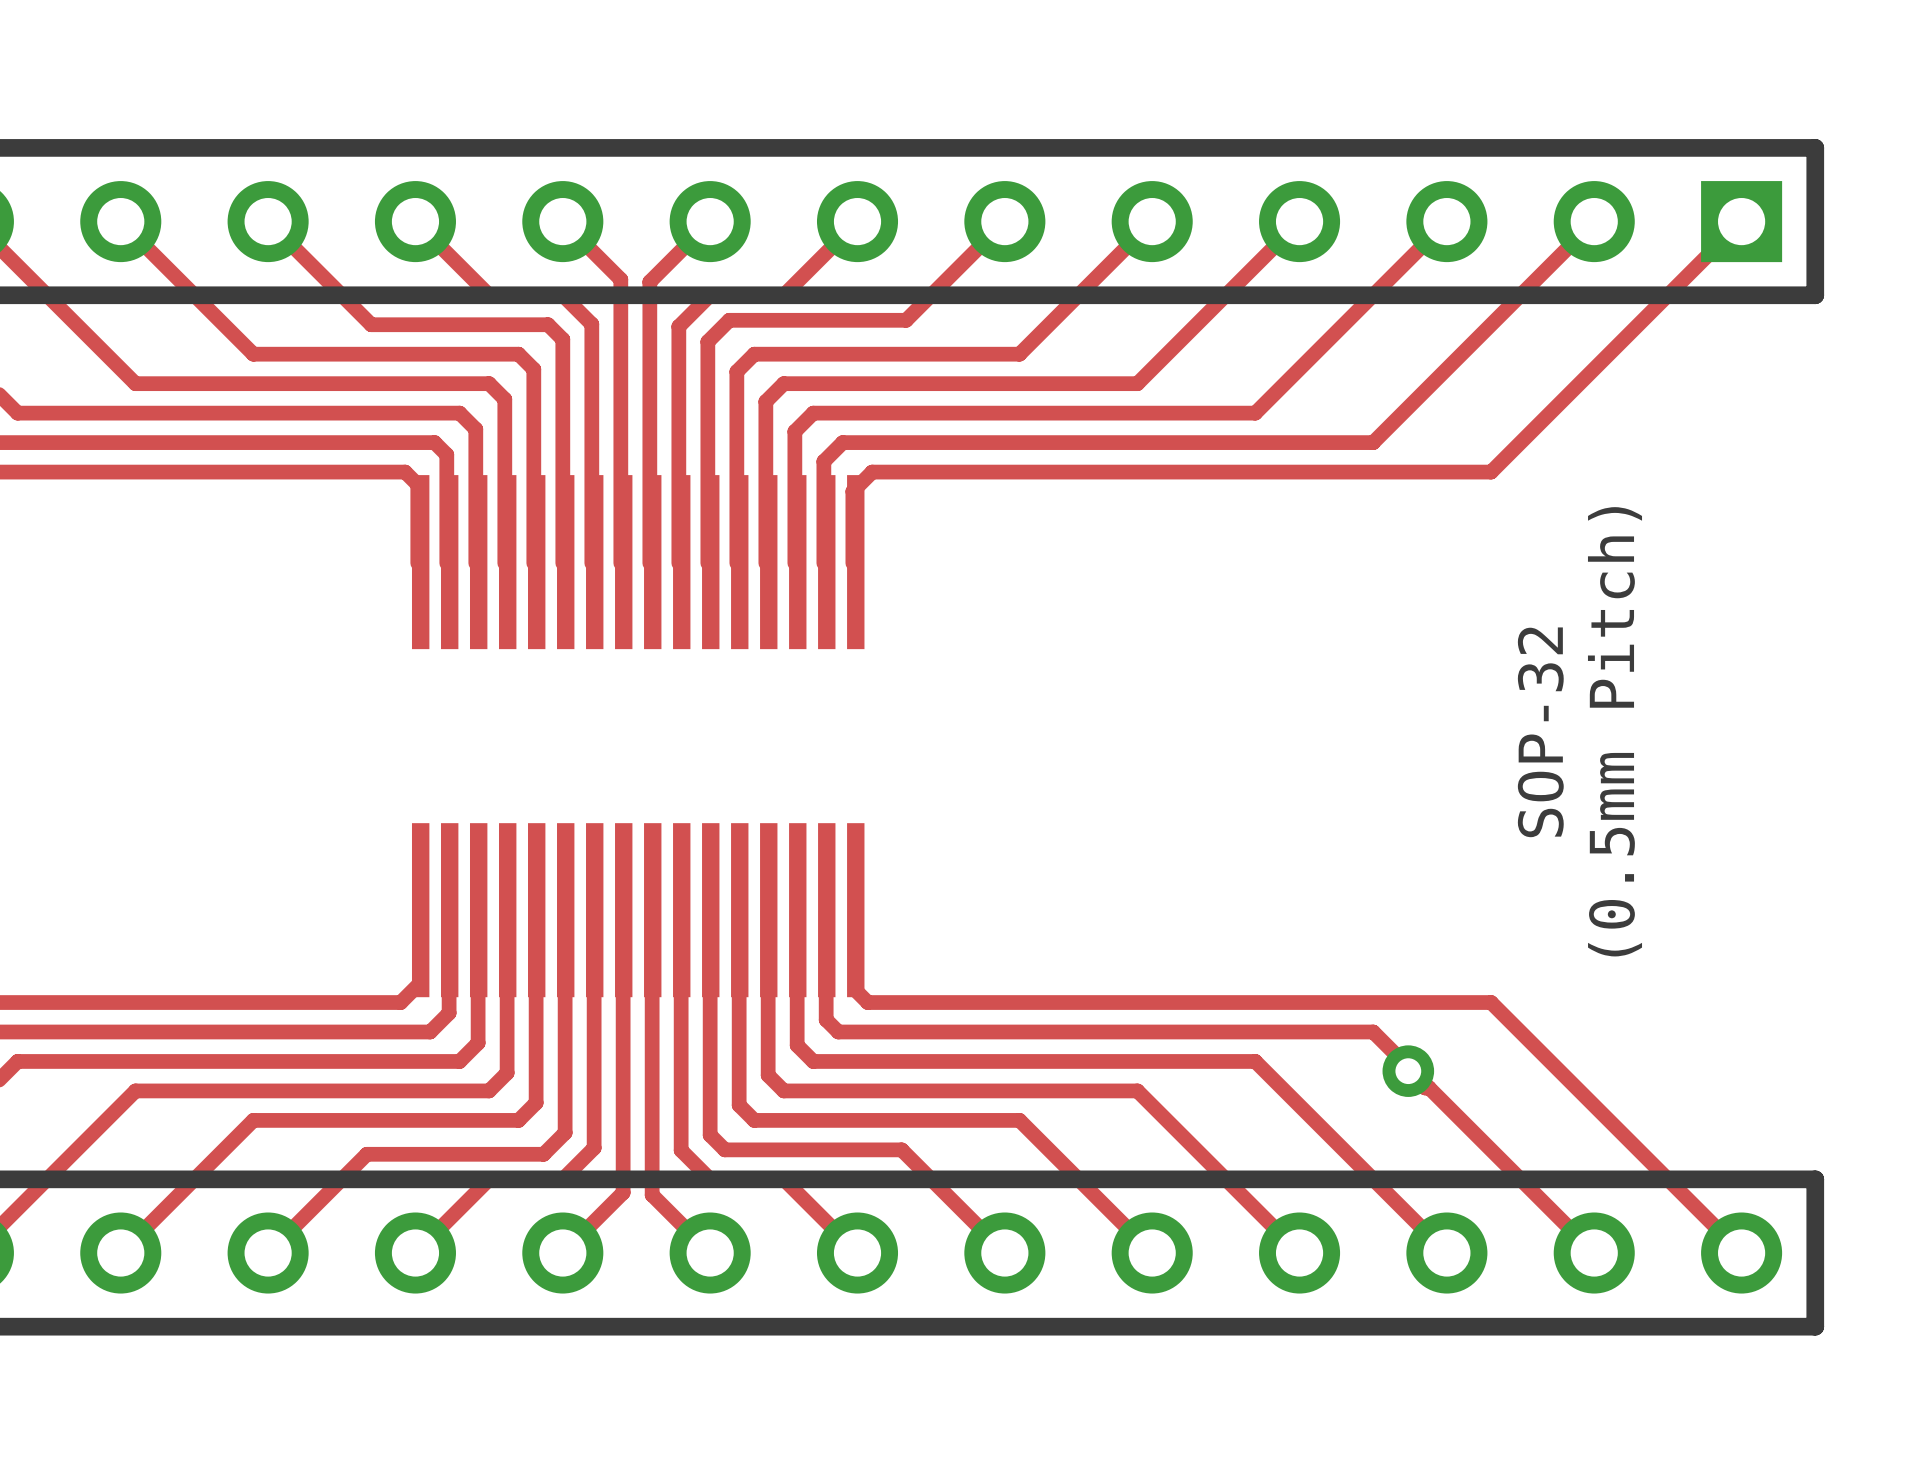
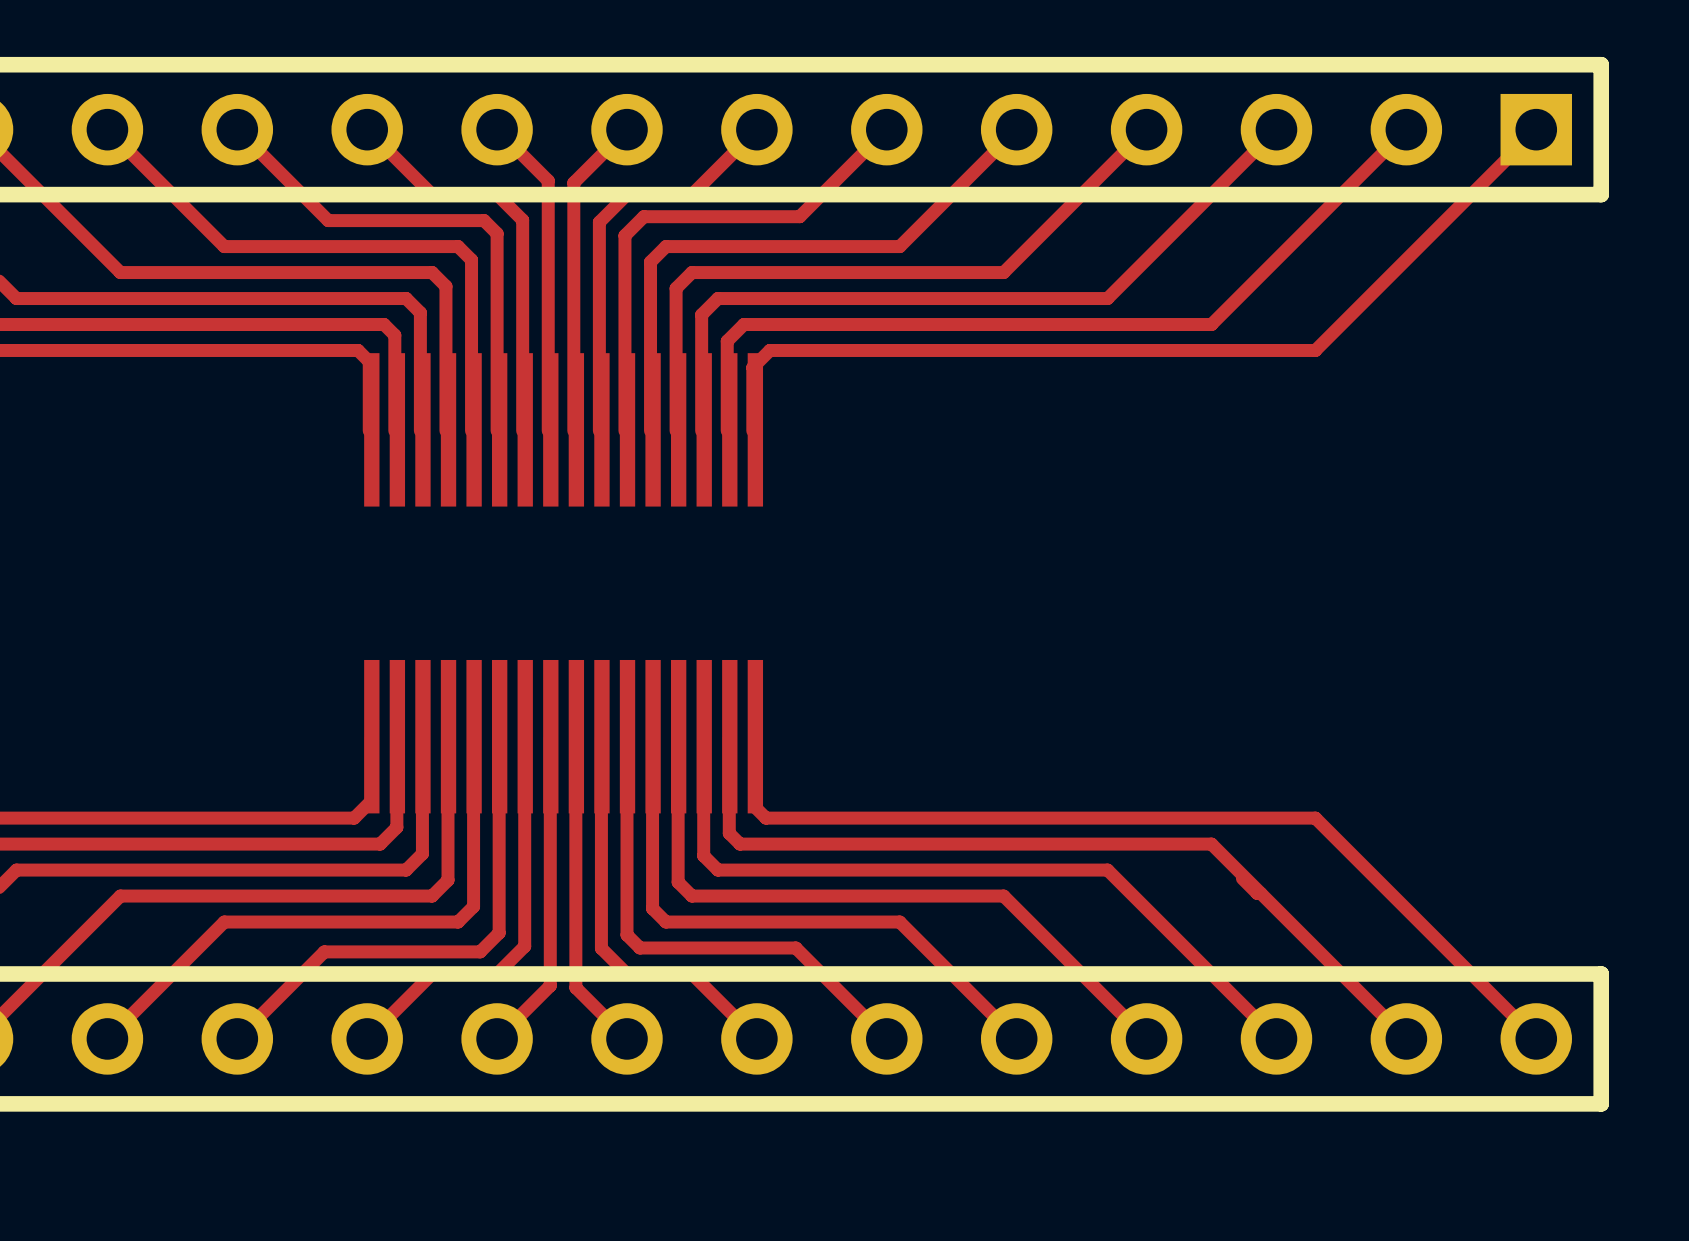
text: (0.5mm Pitch) (1615, 731) -> none
text: SOP-32 (1540, 732) -> none
via: (1408, 1071) -> none

